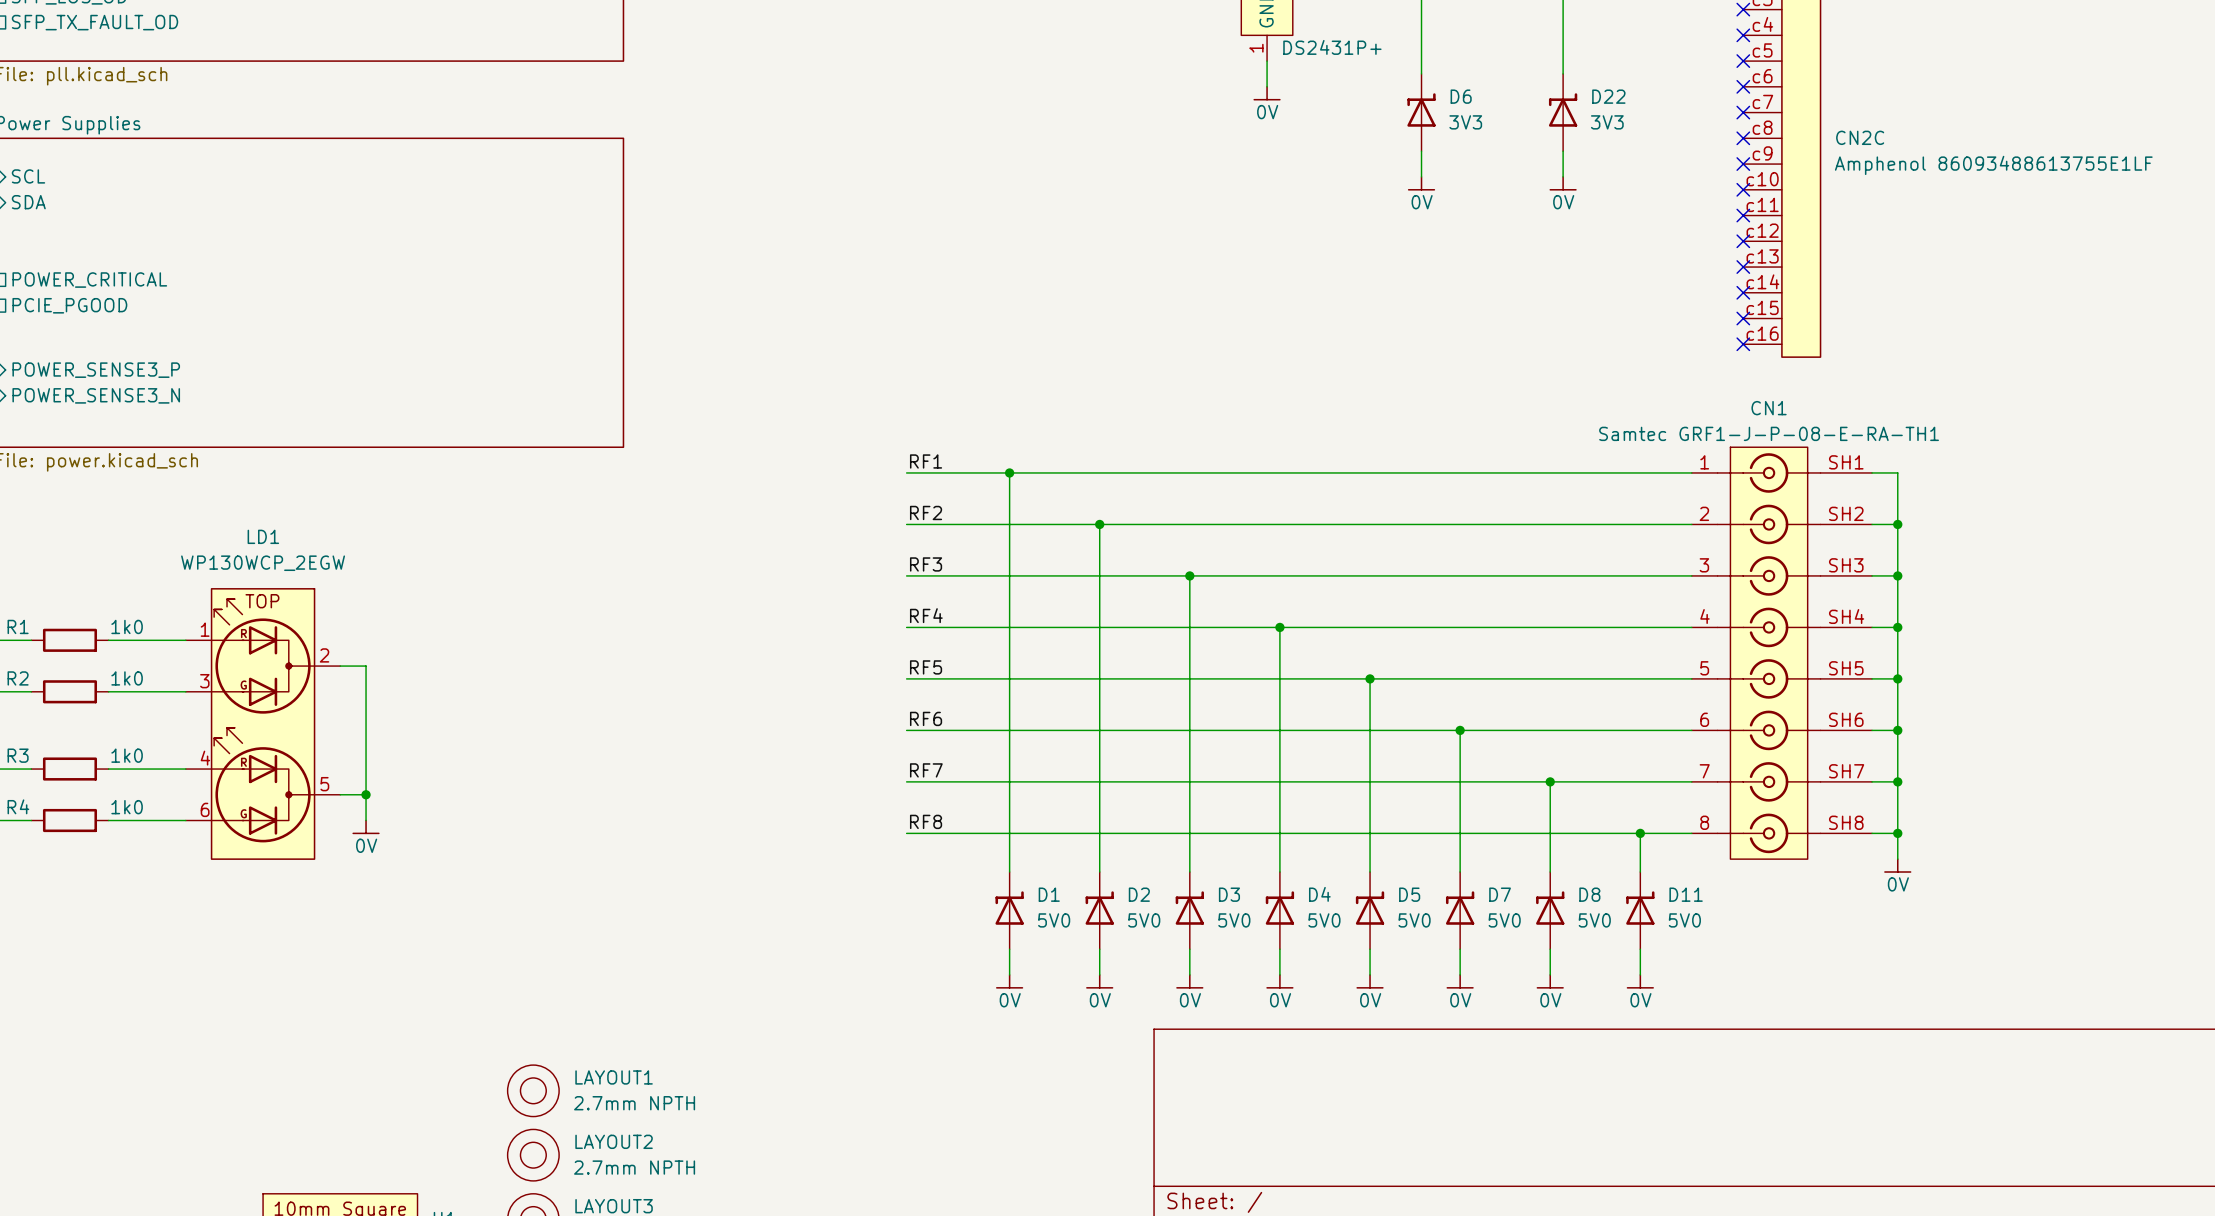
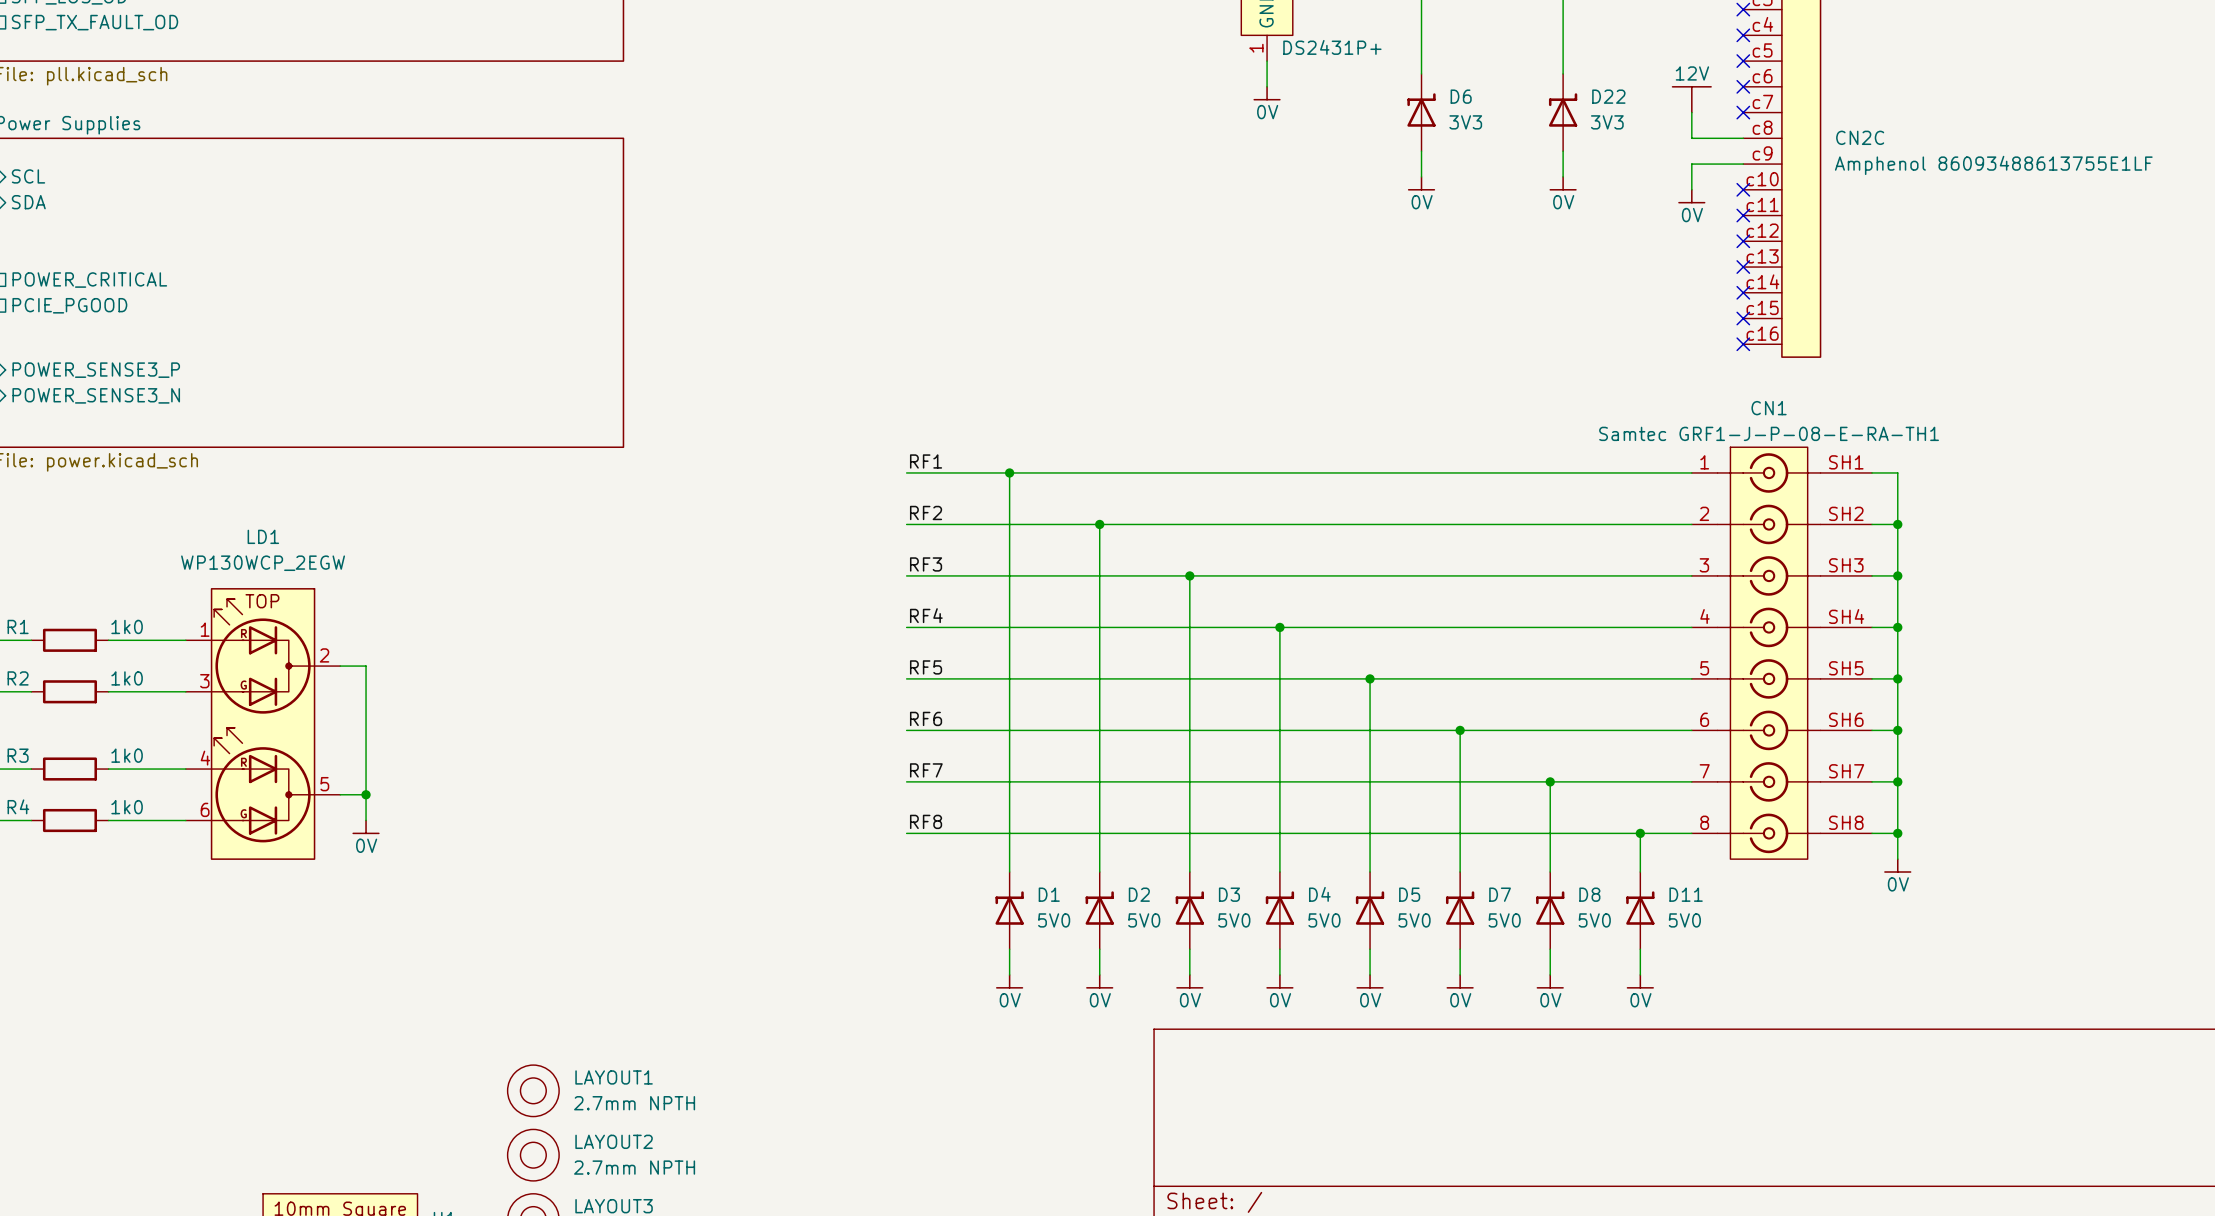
power symbol: none -> 12V (1691, 99)
wire: none -> (1691, 112) (1691, 138) (1743, 138)
no-connect mark: (1743, 138) -> none
wire: none -> (1743, 164) (1691, 164) (1691, 189)
no-connect mark: (1743, 164) -> none
power symbol: none -> 0V (1691, 196)

